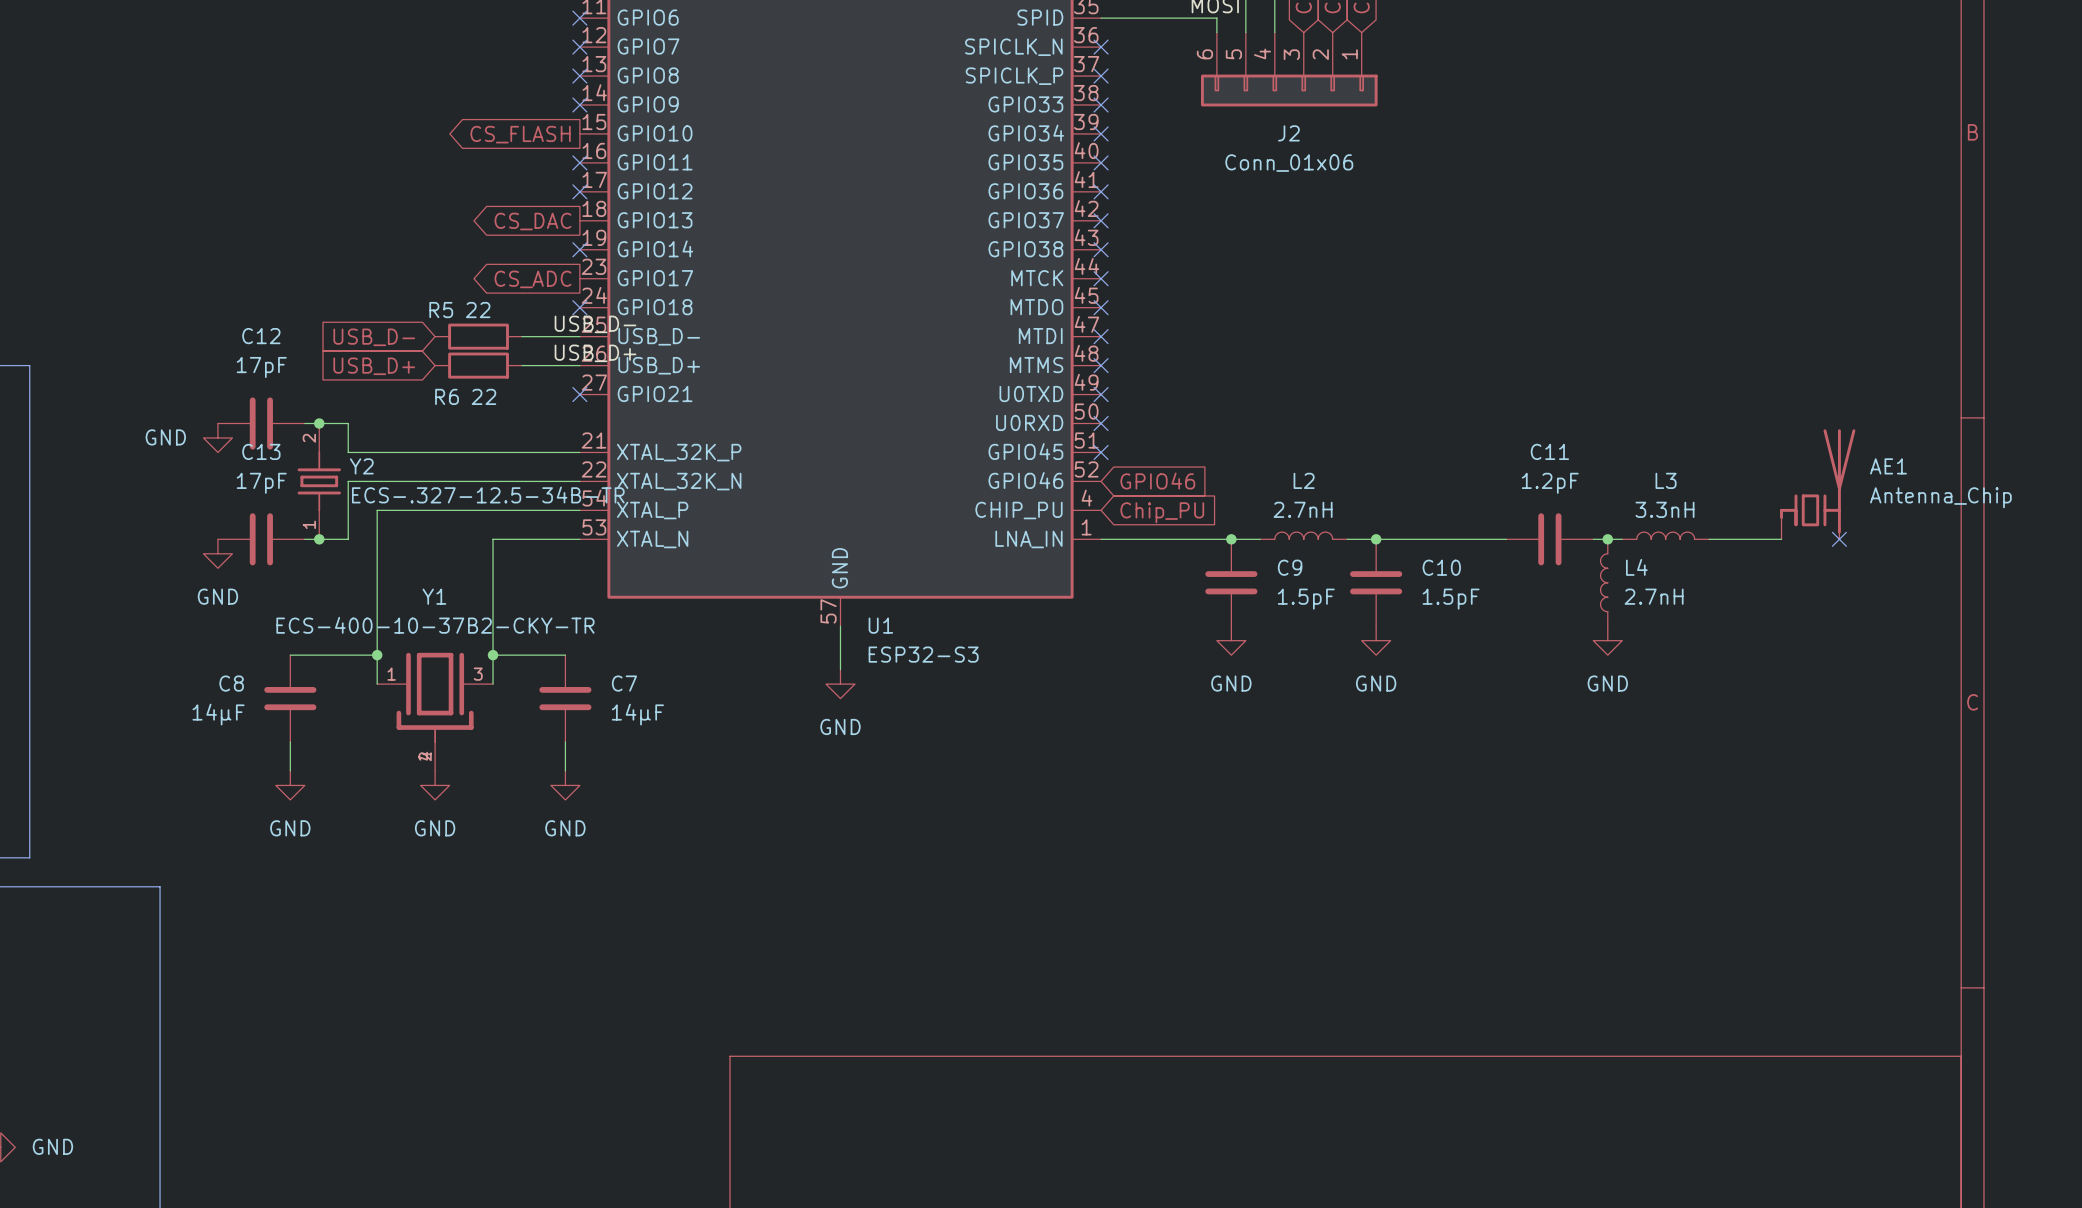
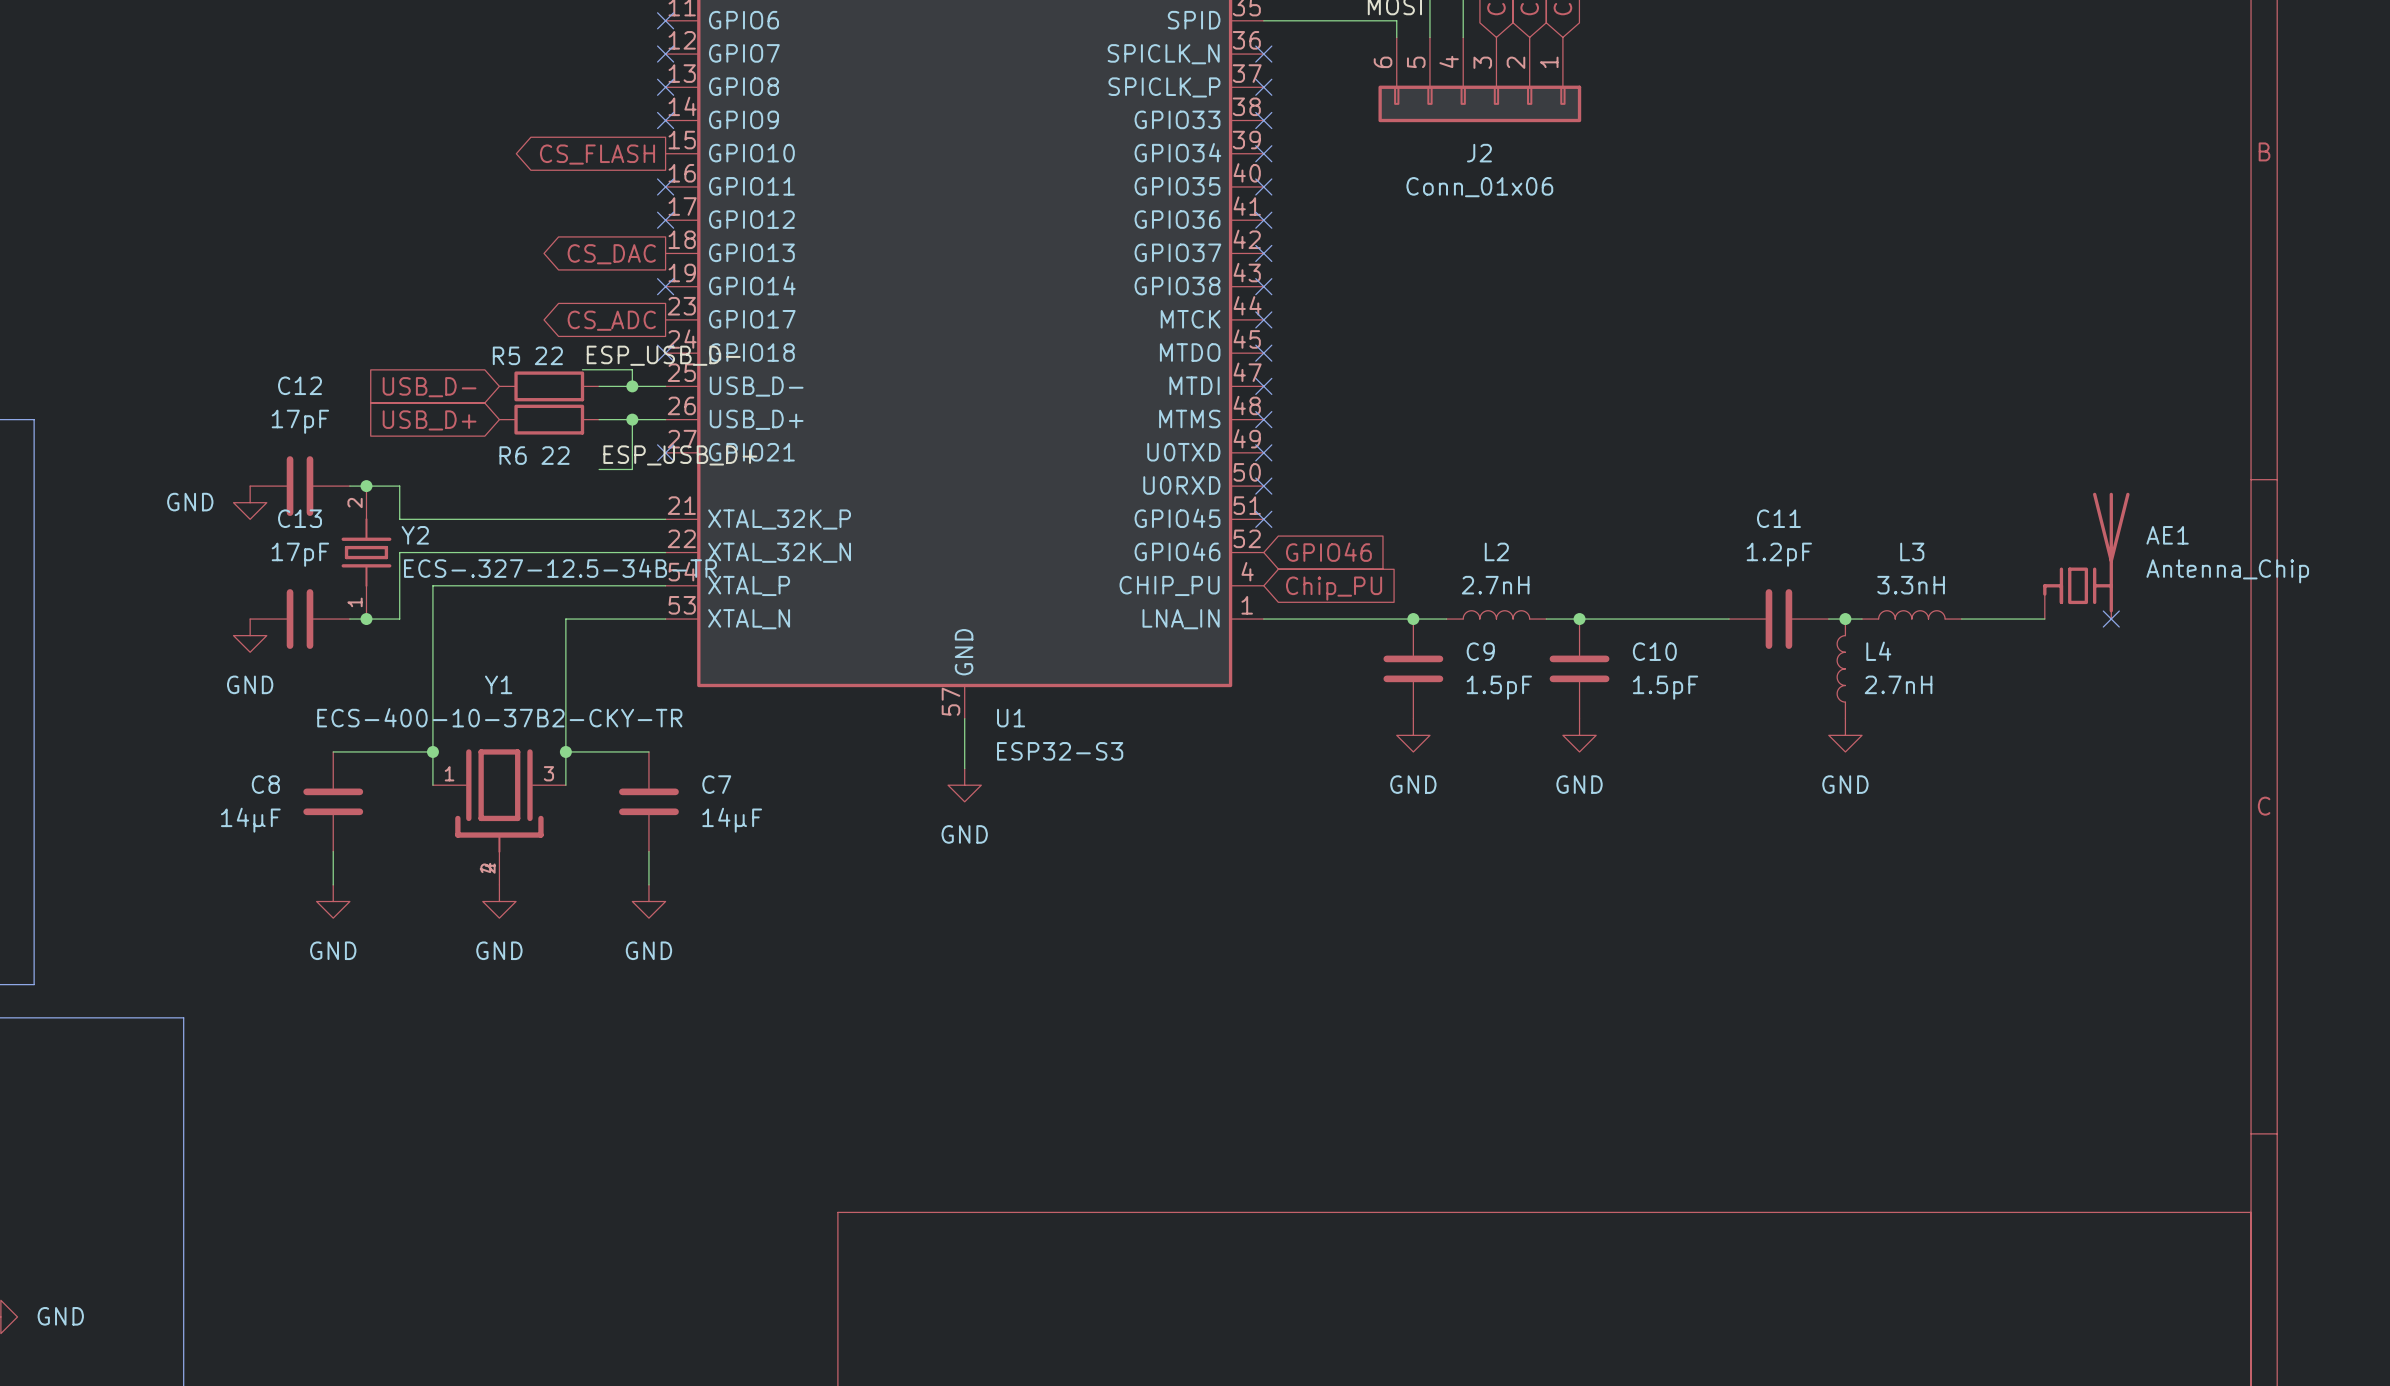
wire: none -> (582, 369) (632, 369) (632, 386)
label: USB_D- (595, 324) -> ESP_USB_D- (663, 355)
junction: none -> (632, 386)
label: USB_D+ (595, 353) -> none
wire: none -> (632, 419) (632, 469) (599, 469)
junction: none -> (632, 419)
label: none -> ESP_USB_D+ (680, 455)

